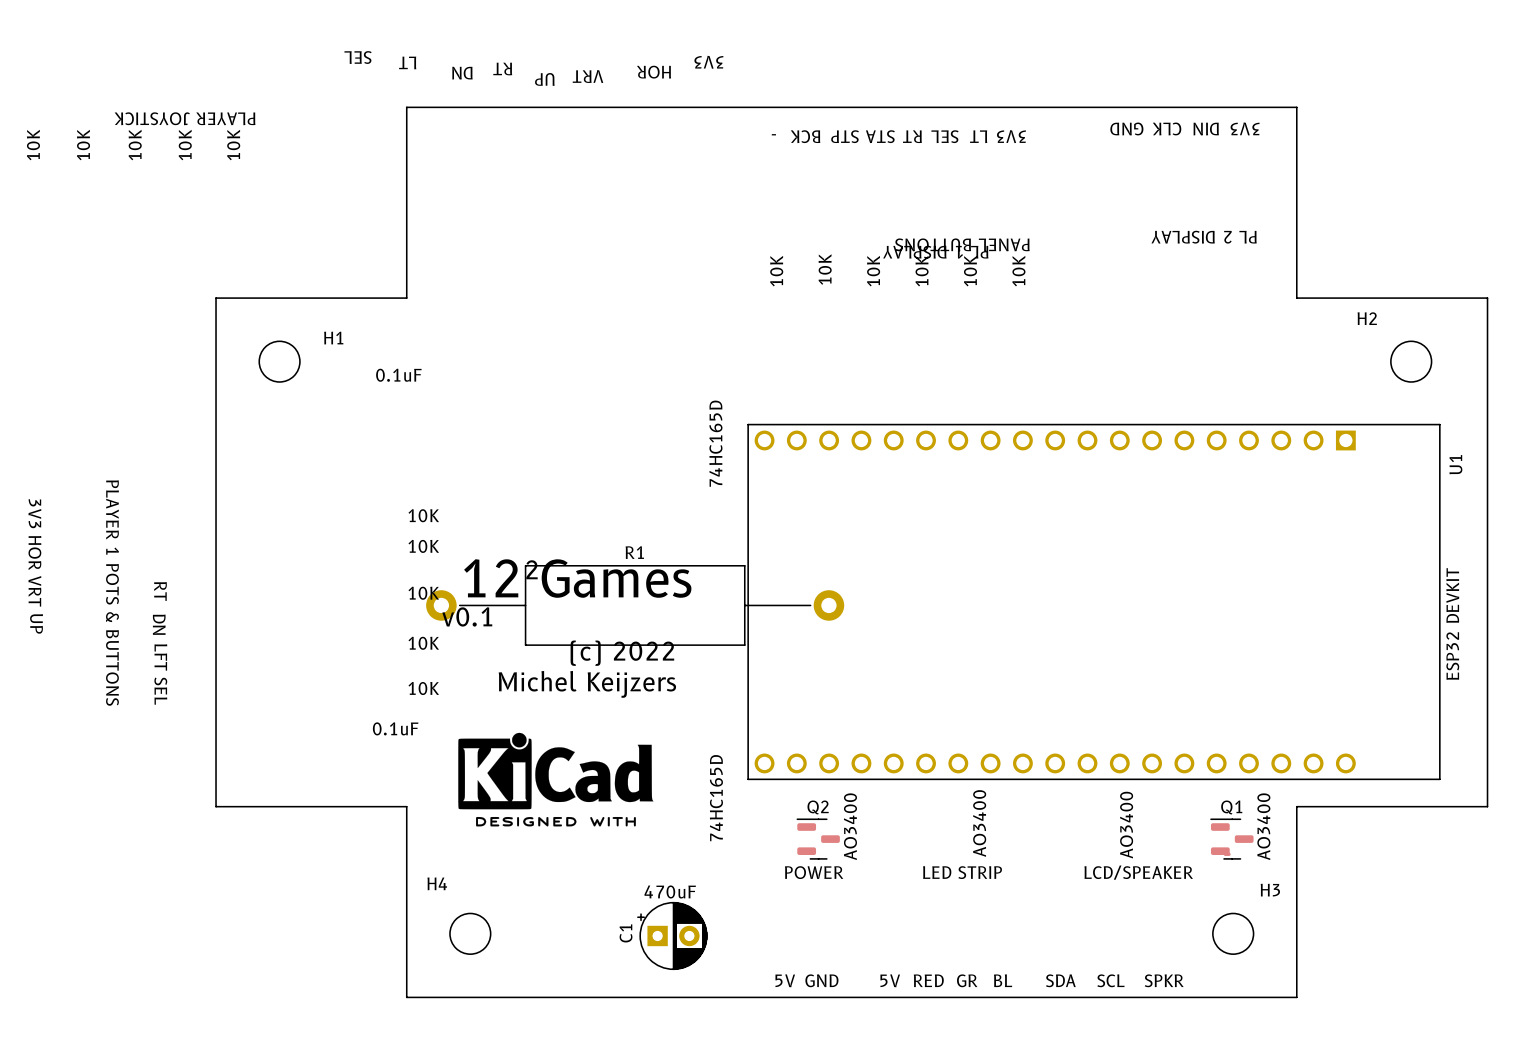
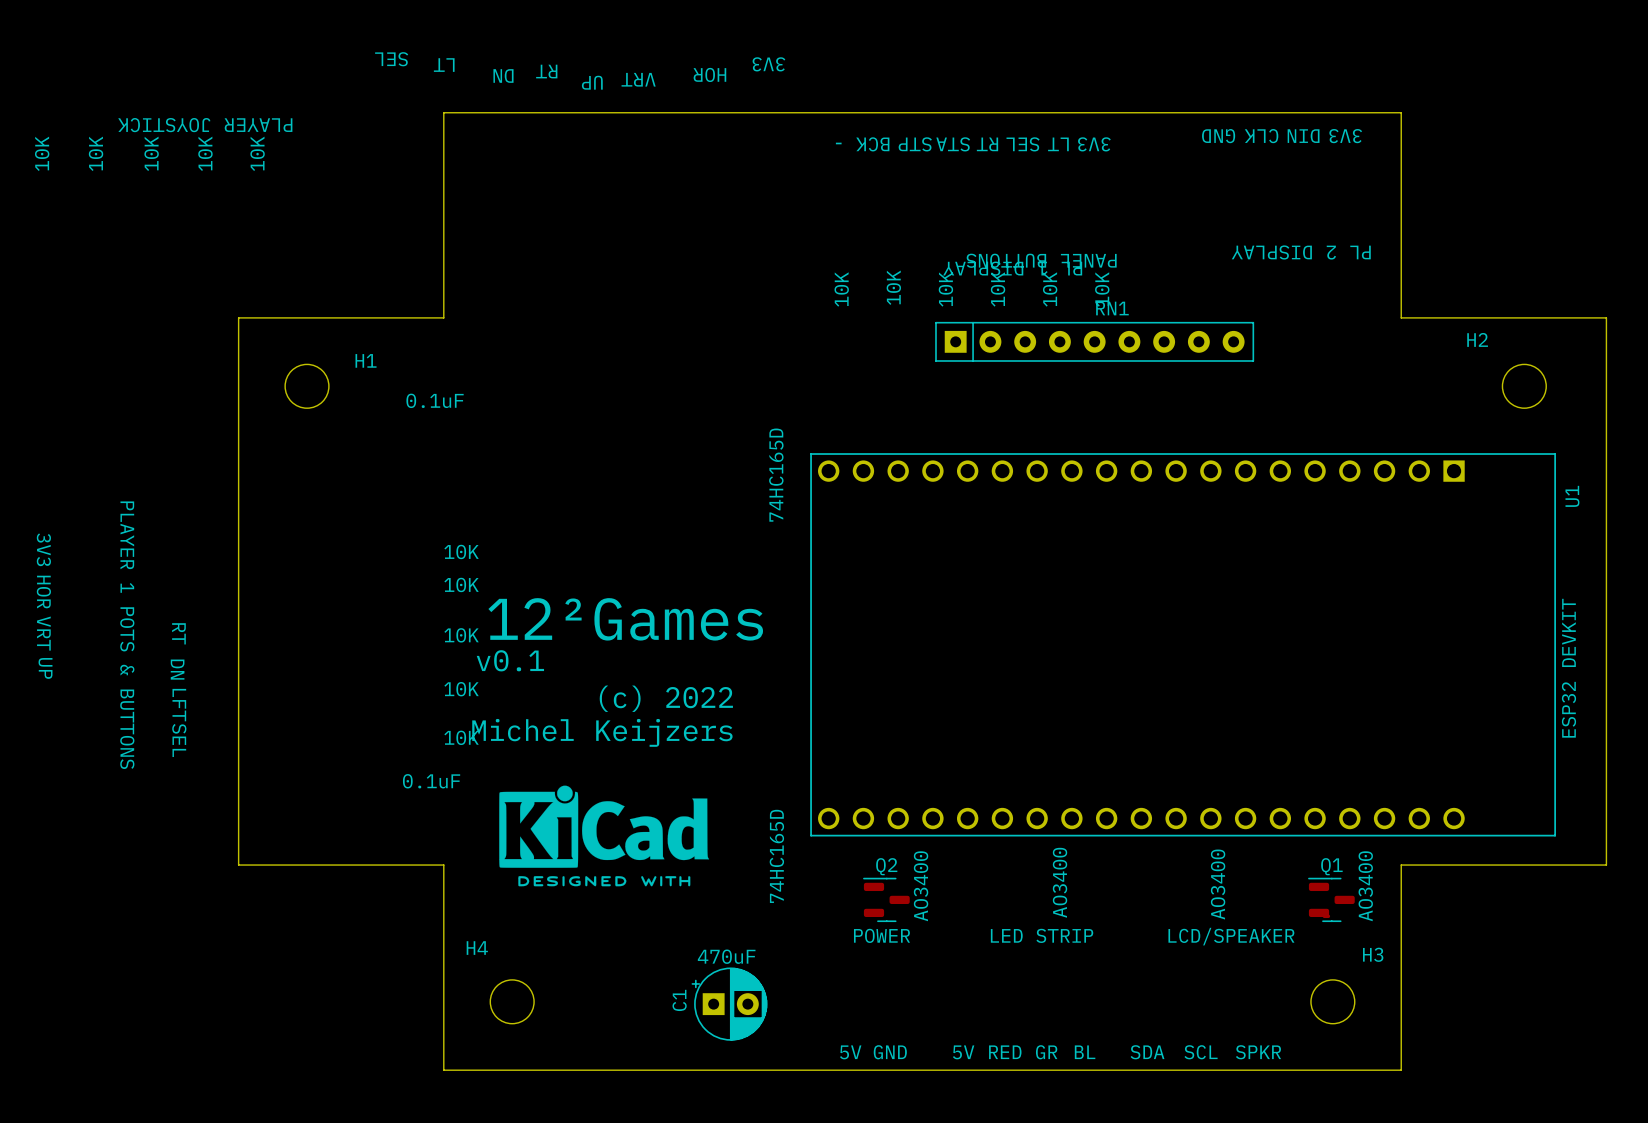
RN1: none -> (1094, 341)
R1: (635, 605) -> none

